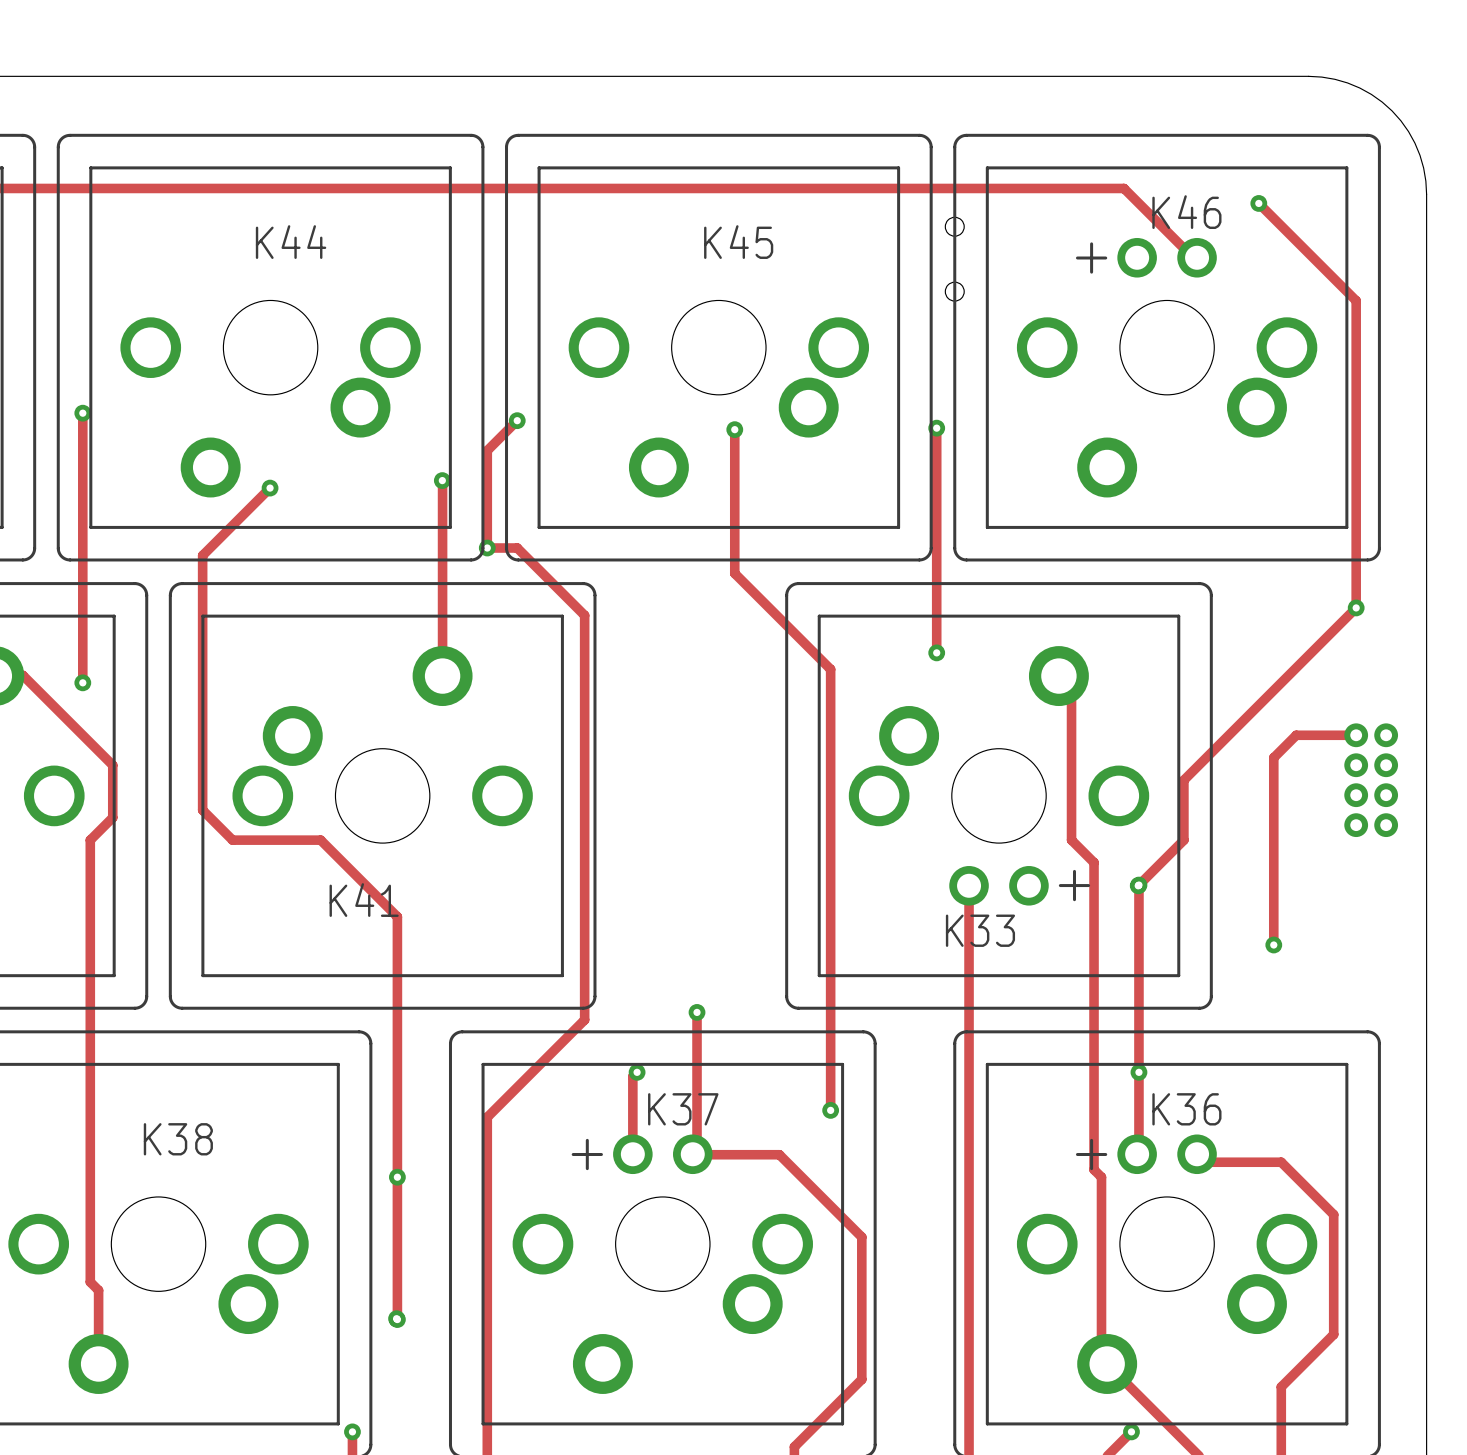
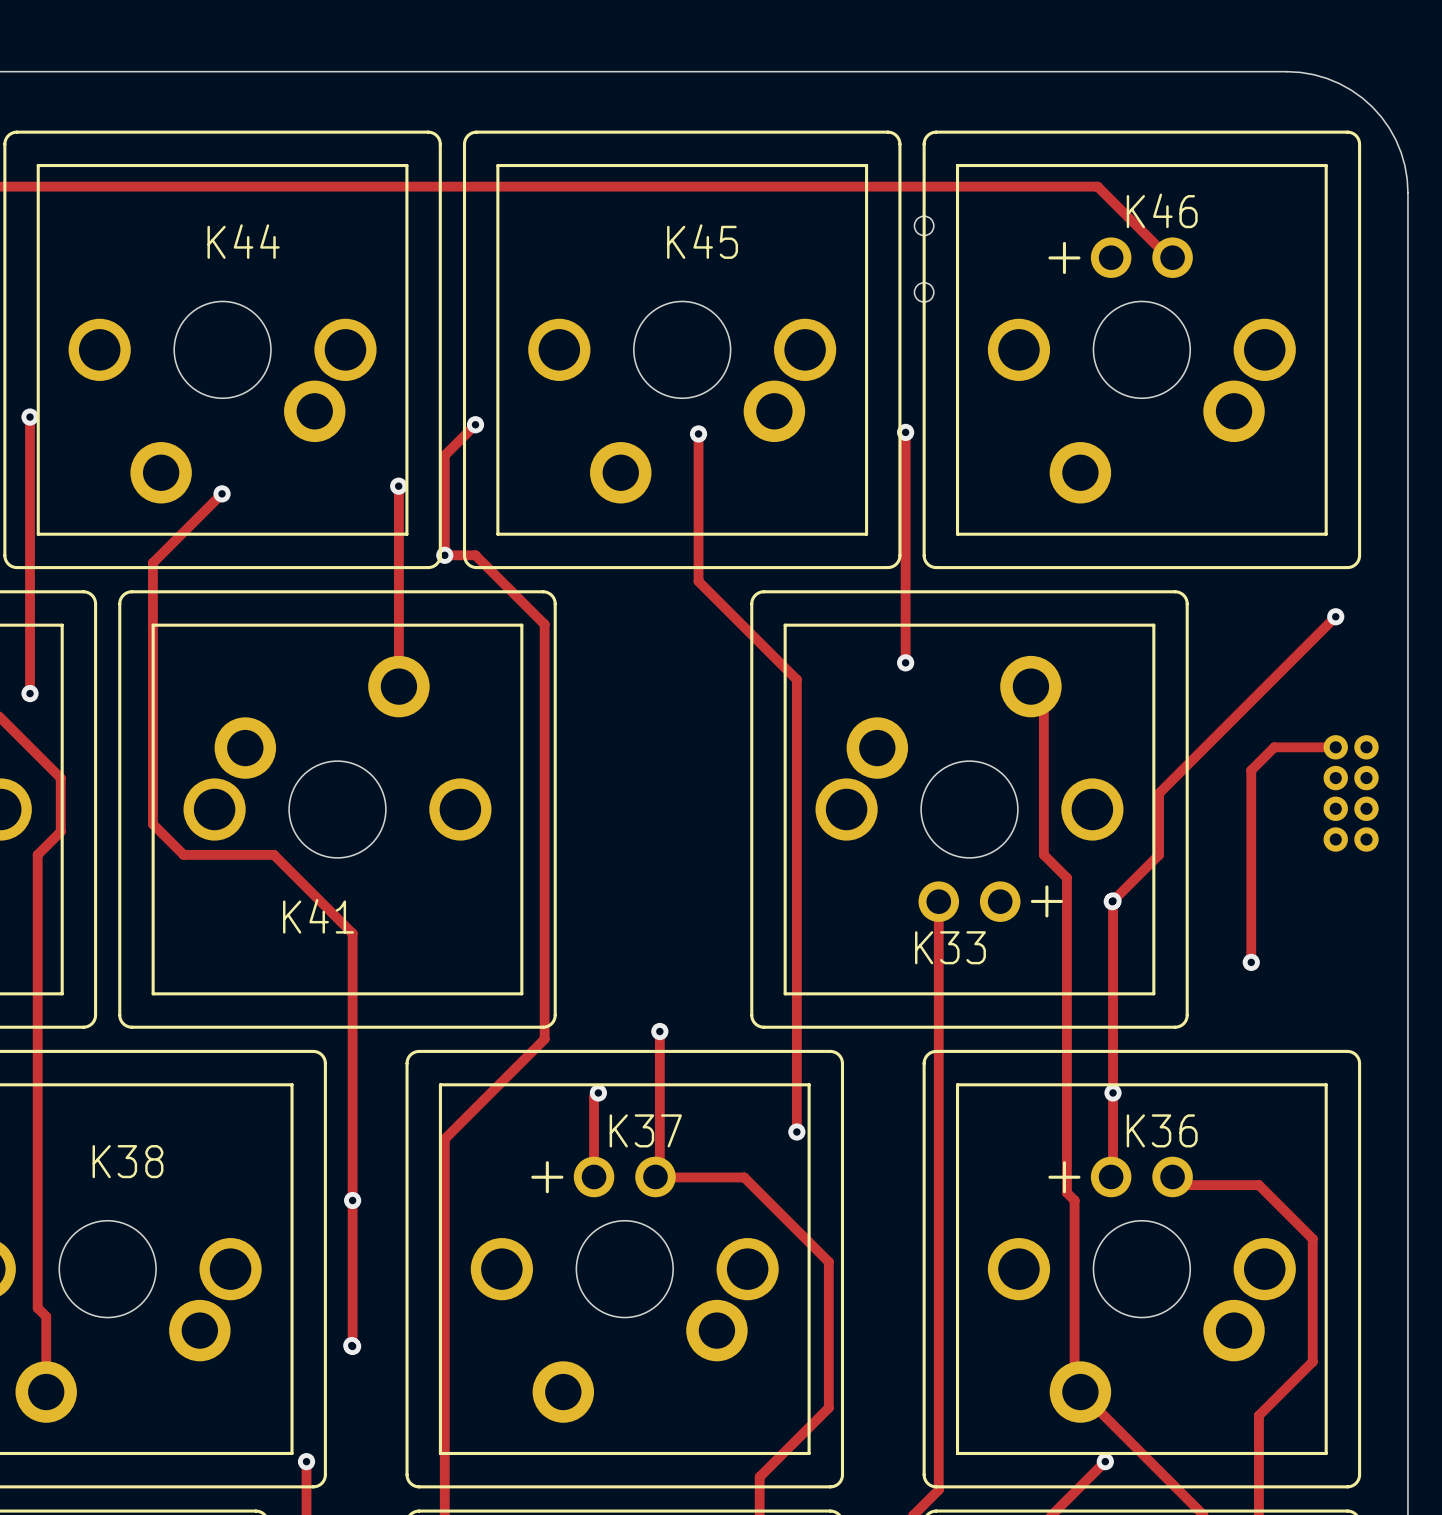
track: (1258, 203) (1356, 300) (1356, 607) -> none
via: (1258, 203) -> none

